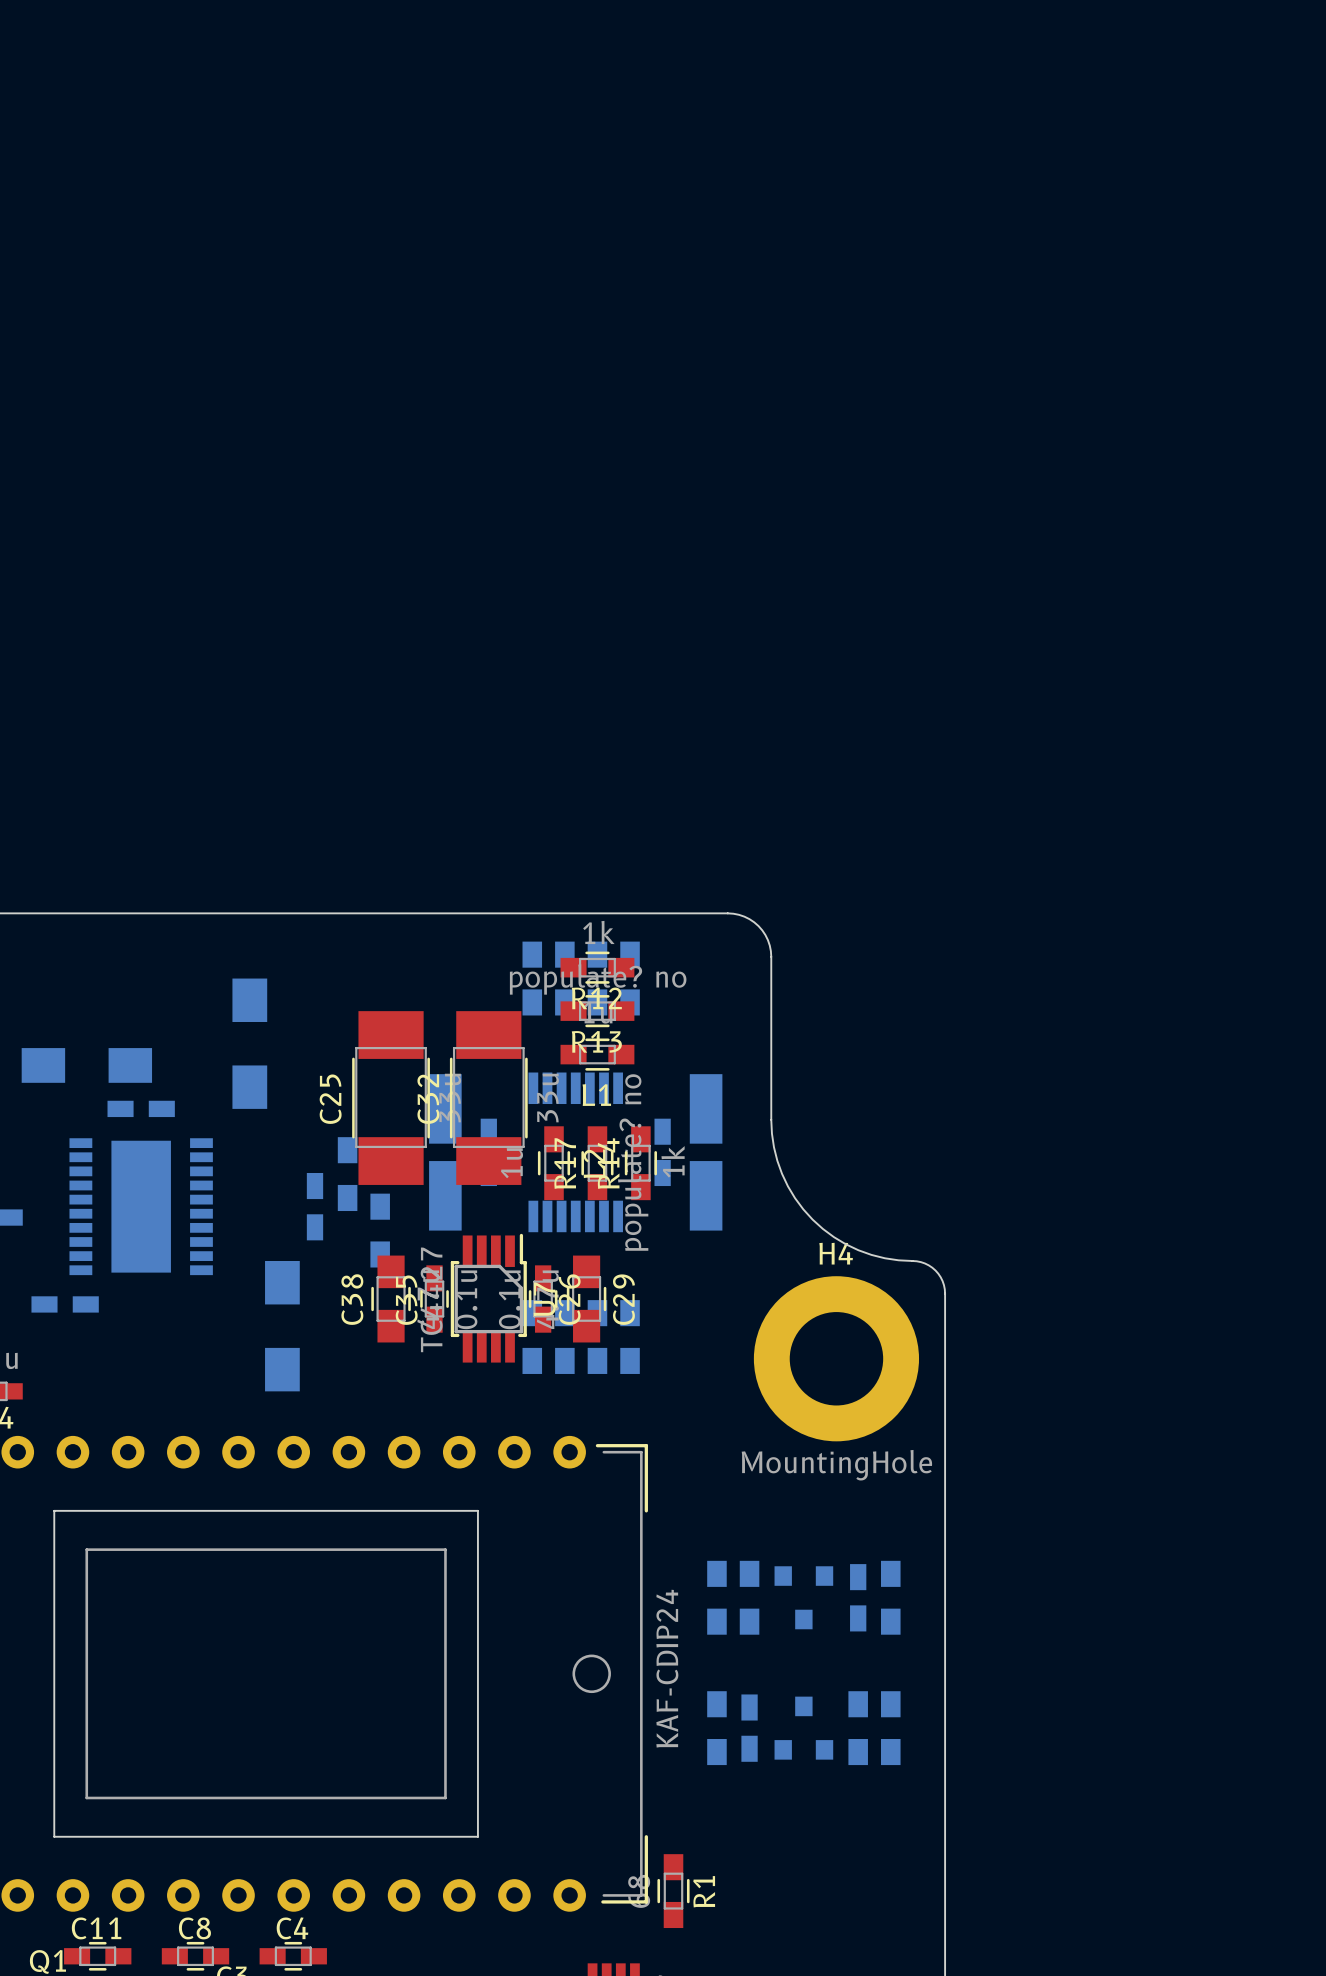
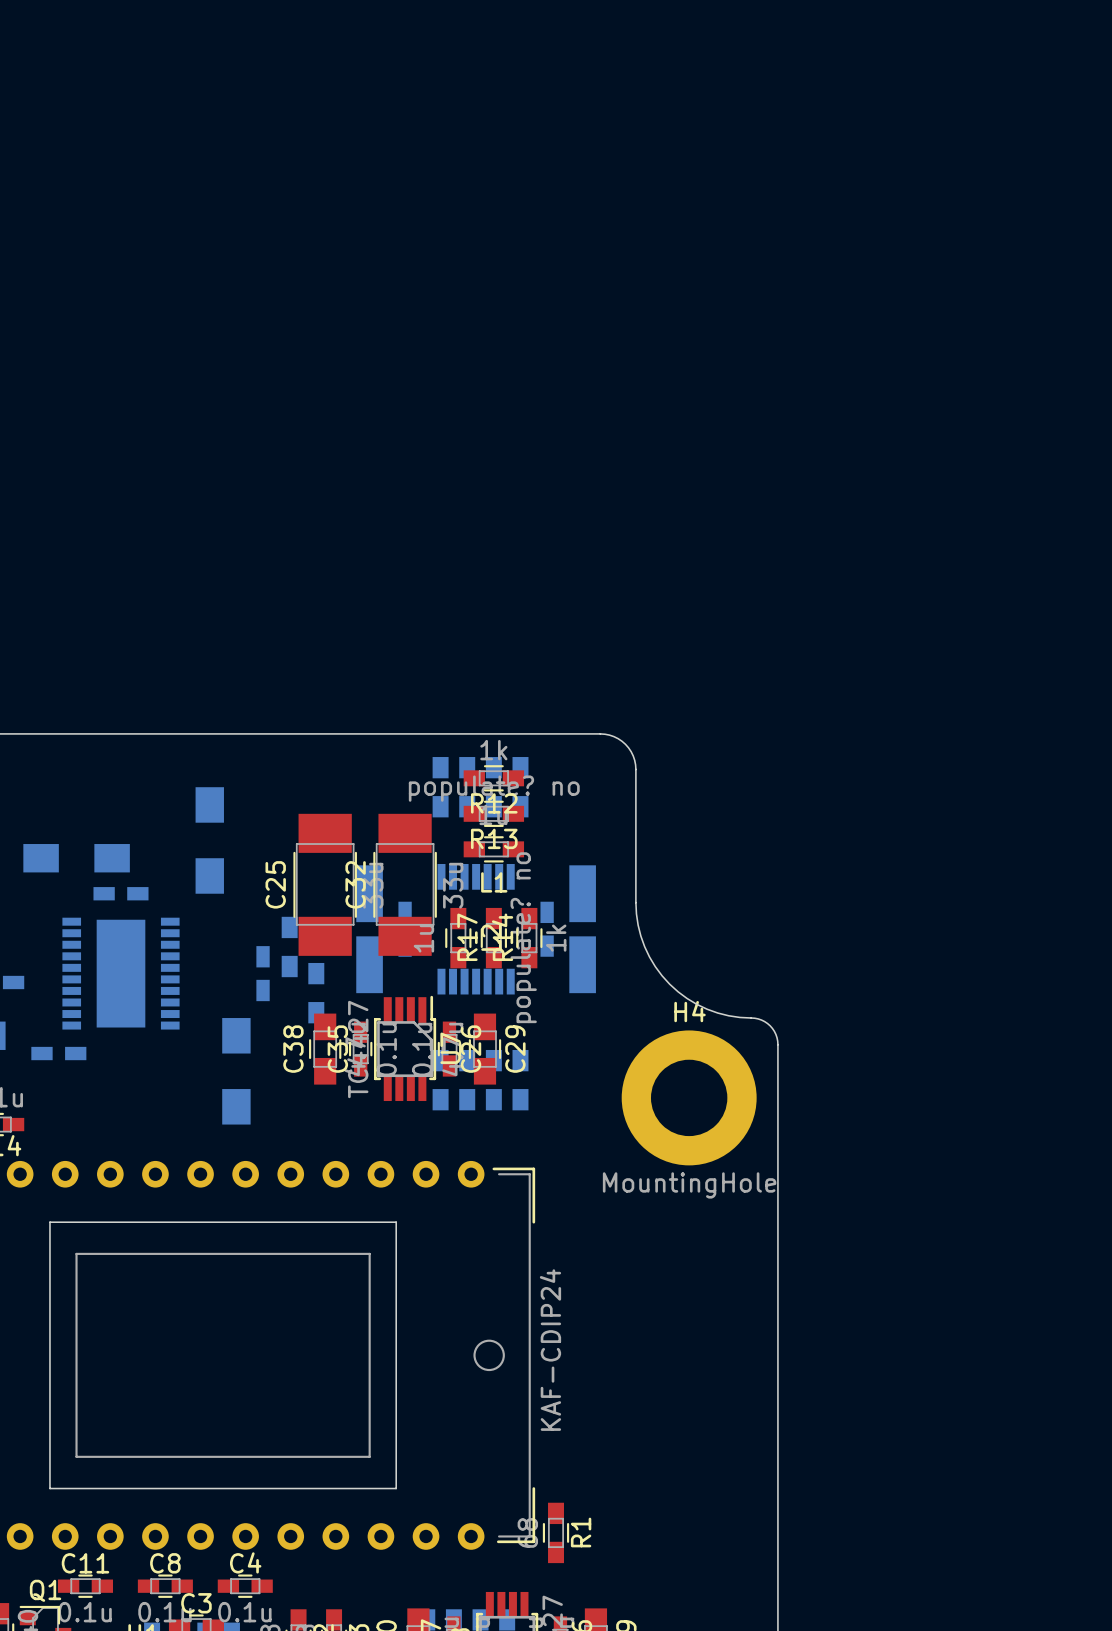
part: (716, 1597) -> none
part: (749, 1597) -> none
part: (803, 1597) -> none
part: (858, 1597) -> none
part: (890, 1597) -> none
part: (716, 1728) -> none
part: (749, 1728) -> none
part: (803, 1728) -> none
part: (858, 1728) -> none
part: (890, 1728) -> none

